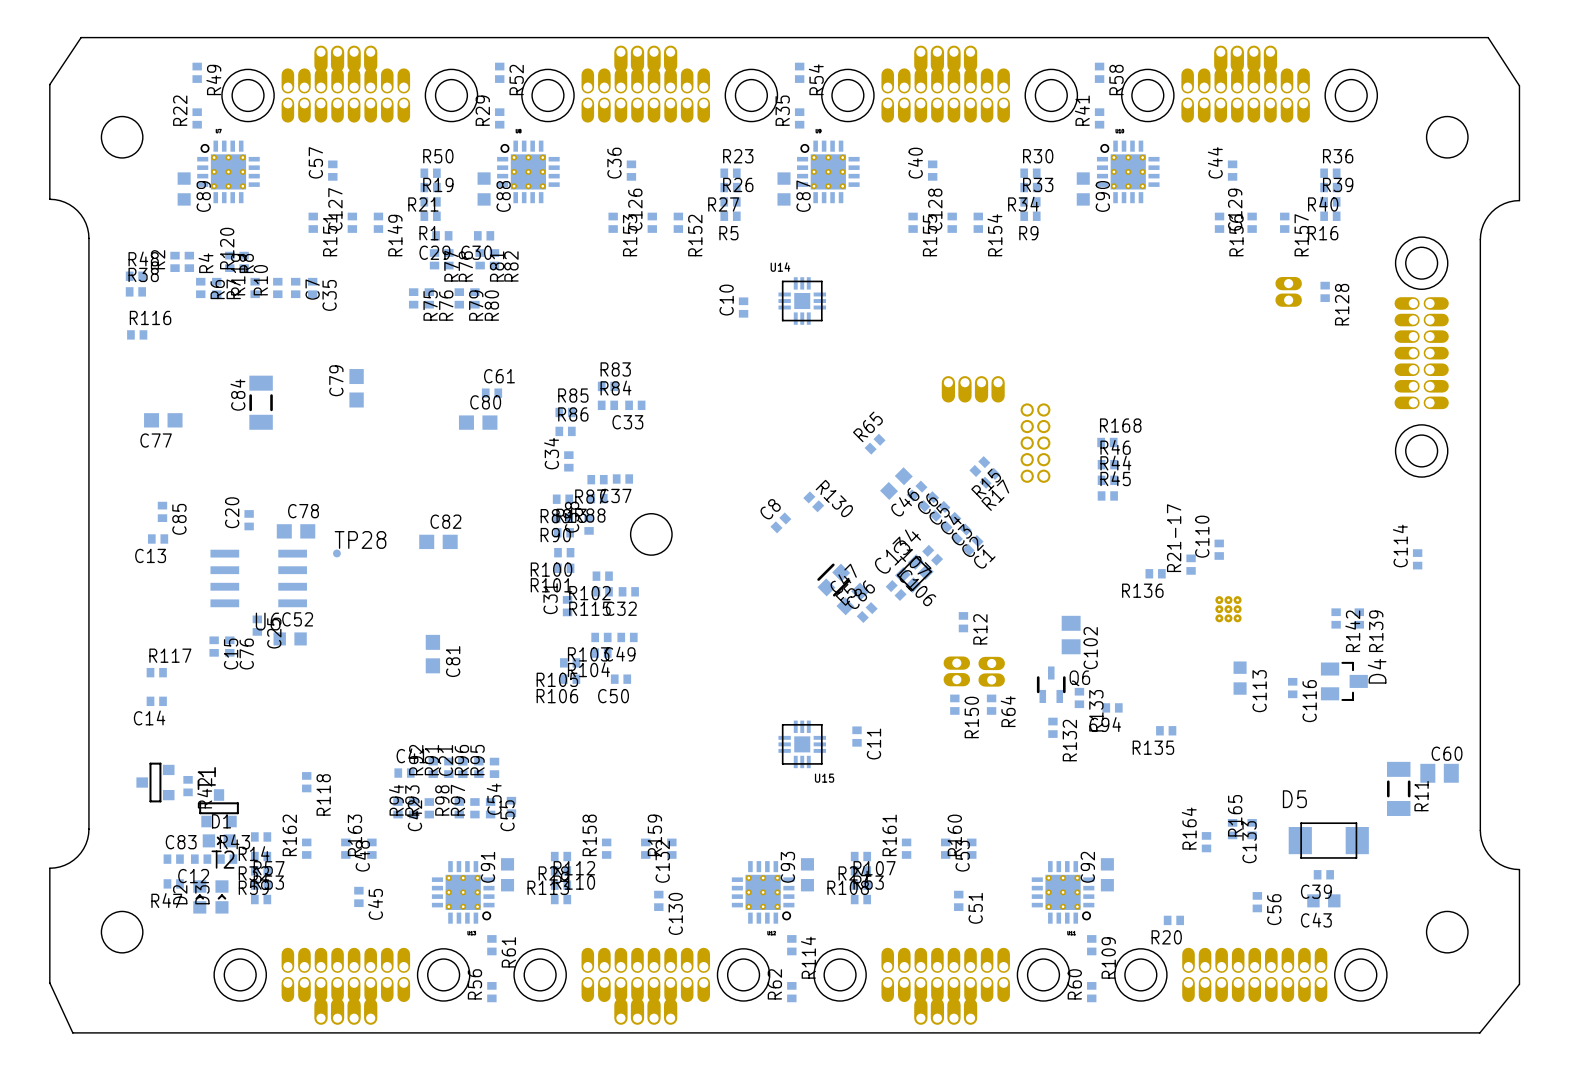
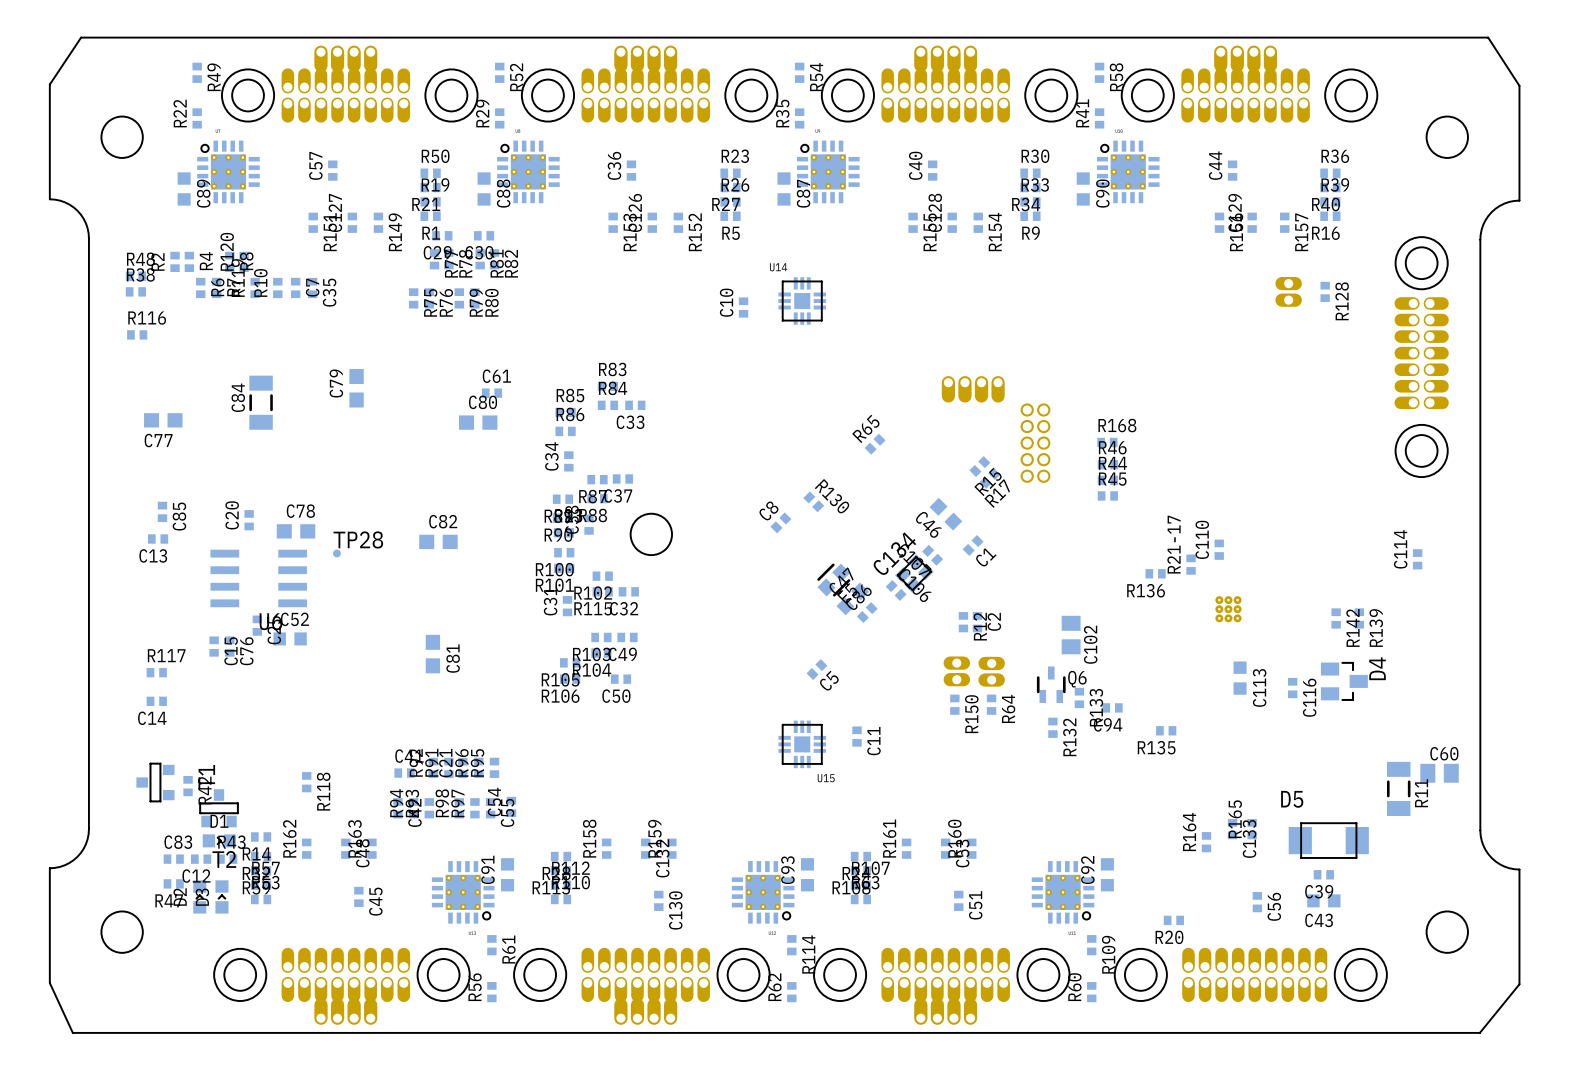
C46 rotation: 0° (896, 483) -> 90° clockwise (945, 514)
C46 position: (896, 483) -> (945, 514)
C6: (917, 491) -> none
C5 position: (928, 501) -> (816, 669)
C4: (939, 511) -> none
C3: (950, 522) -> none
C2 rotation: 0° (961, 533) -> 45° counterclockwise (977, 622)
C2 position: (961, 533) -> (977, 622)

